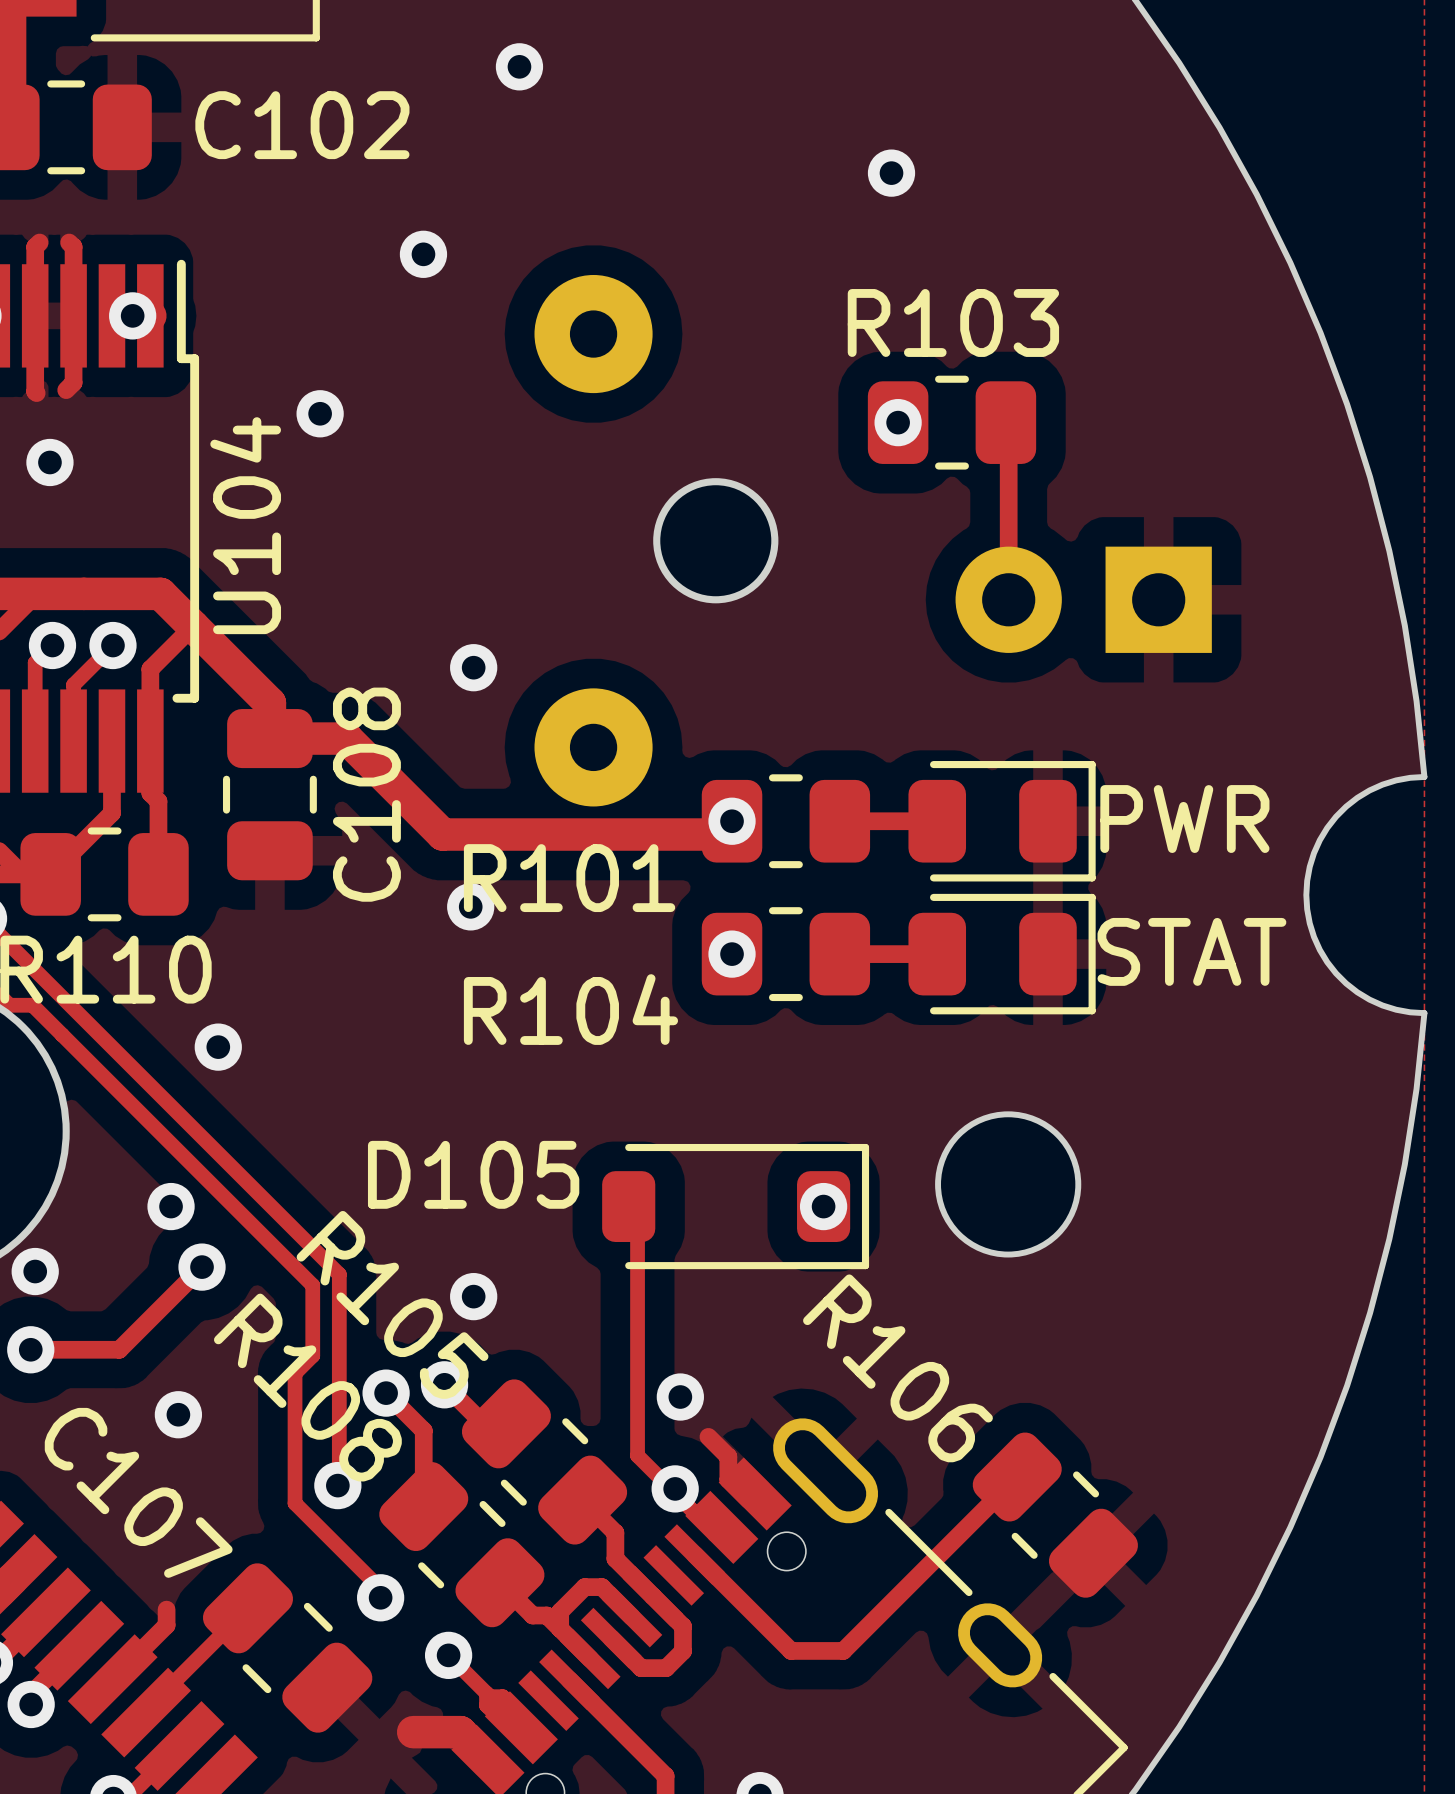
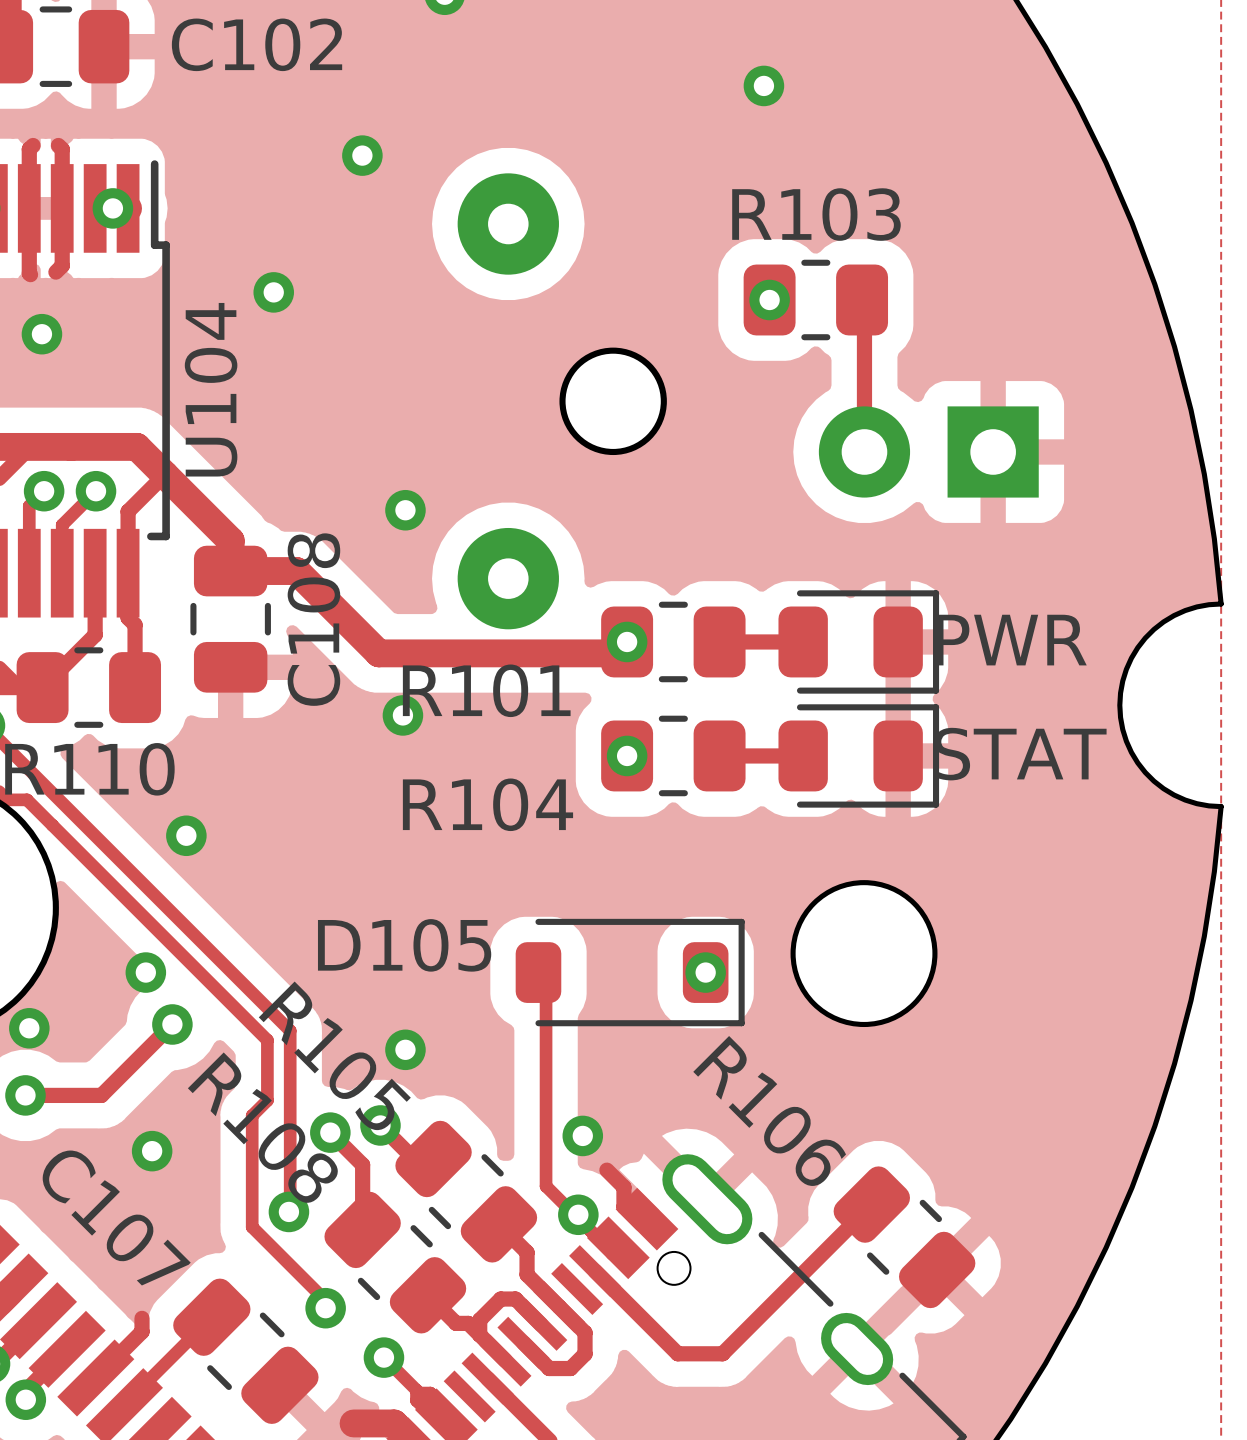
round board edge size: [935, 1111, 1082, 1258] -> [790, 880, 938, 1028]

